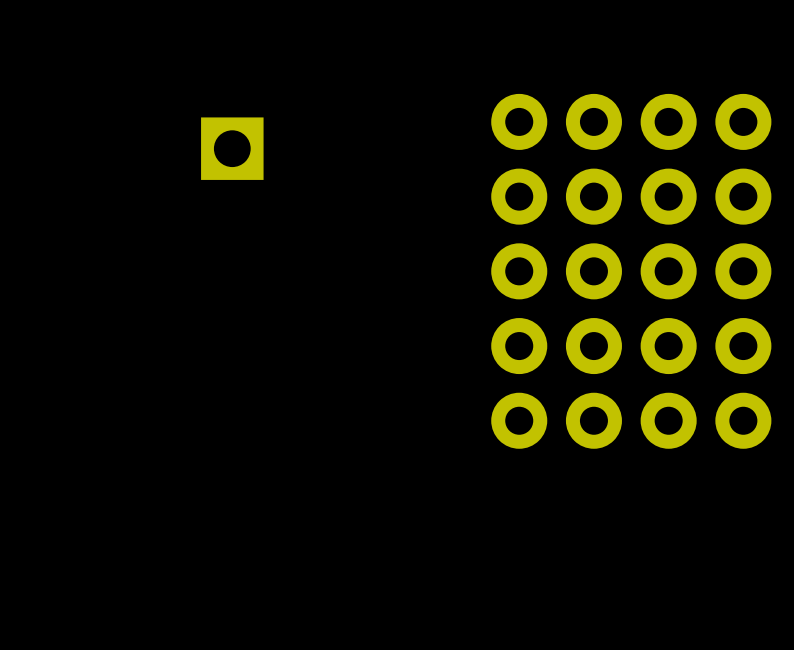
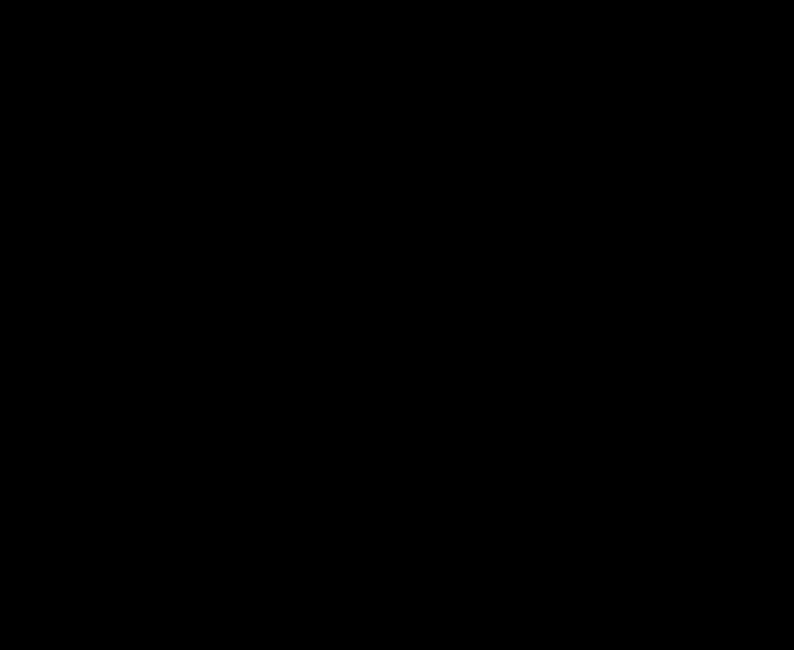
part: (232, 148) -> none
part: (631, 271) -> none

